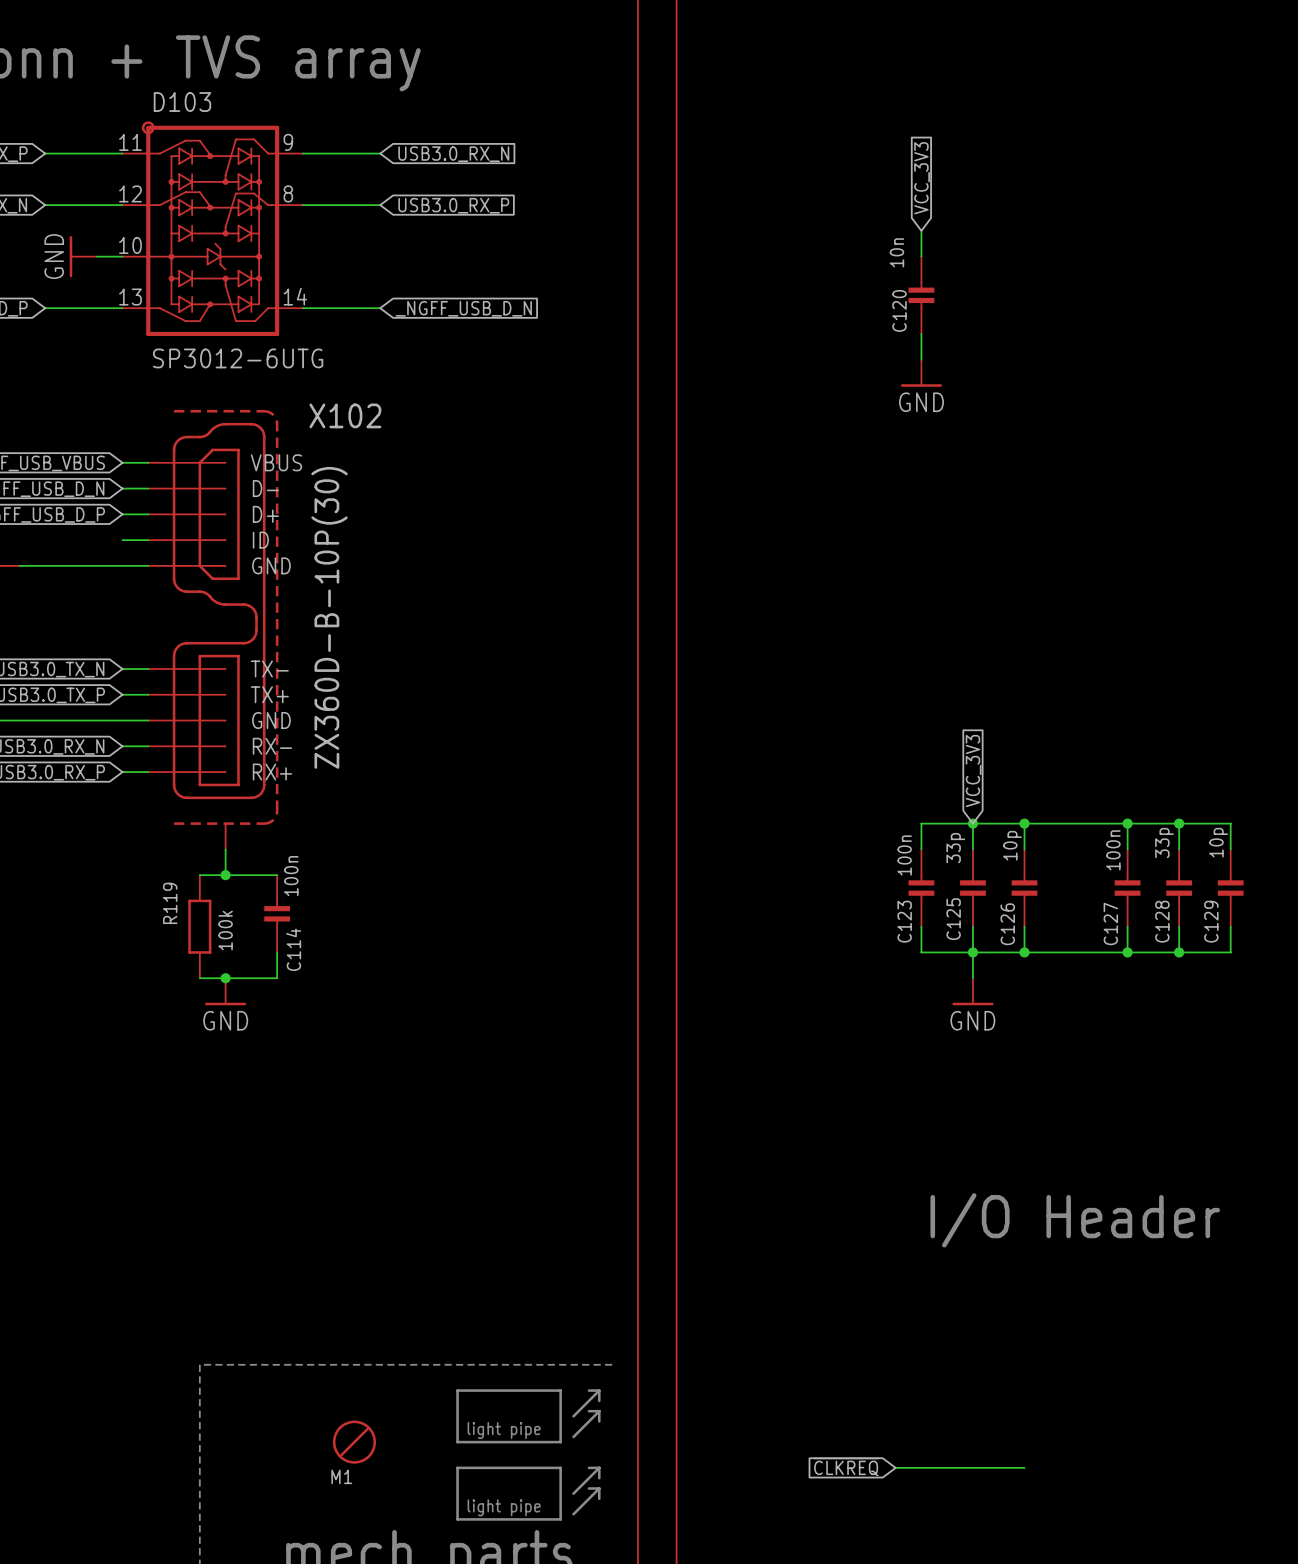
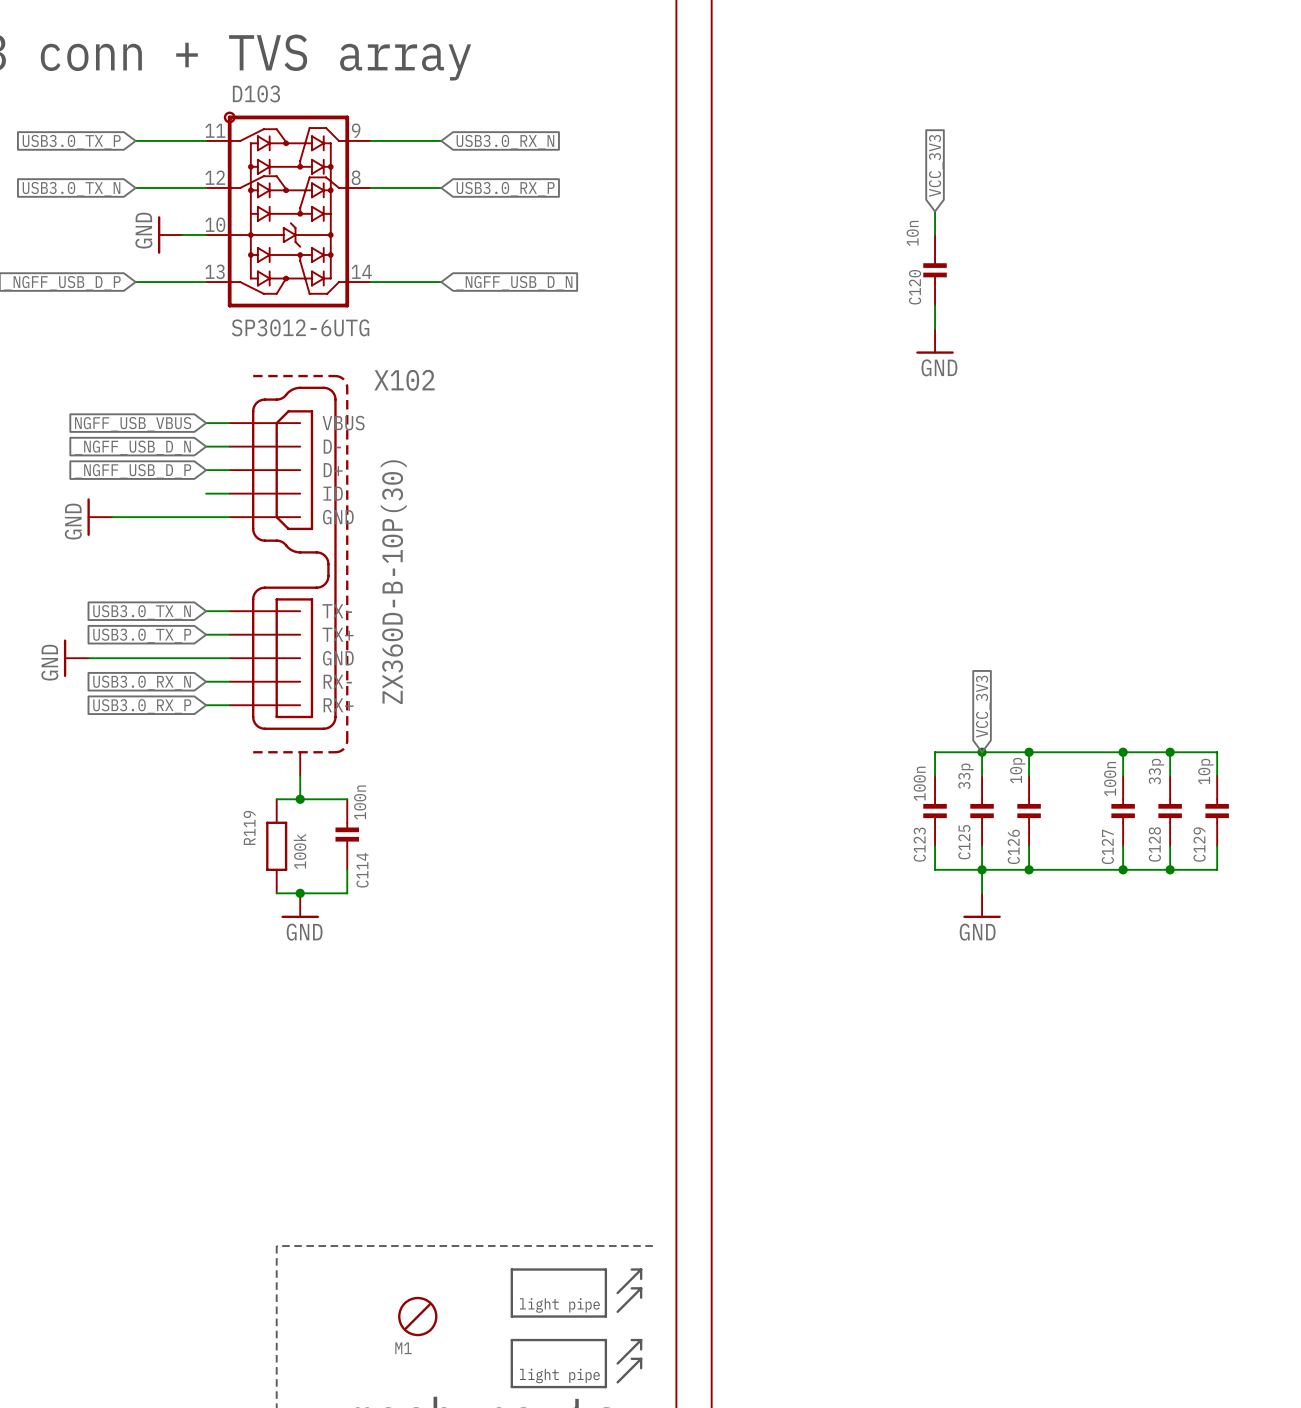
text: I/O Header (1075, 1220) -> none
global label: ~{CLKREQ} (846, 1467) -> none
wire: (895, 1467) (1024, 1467) -> none

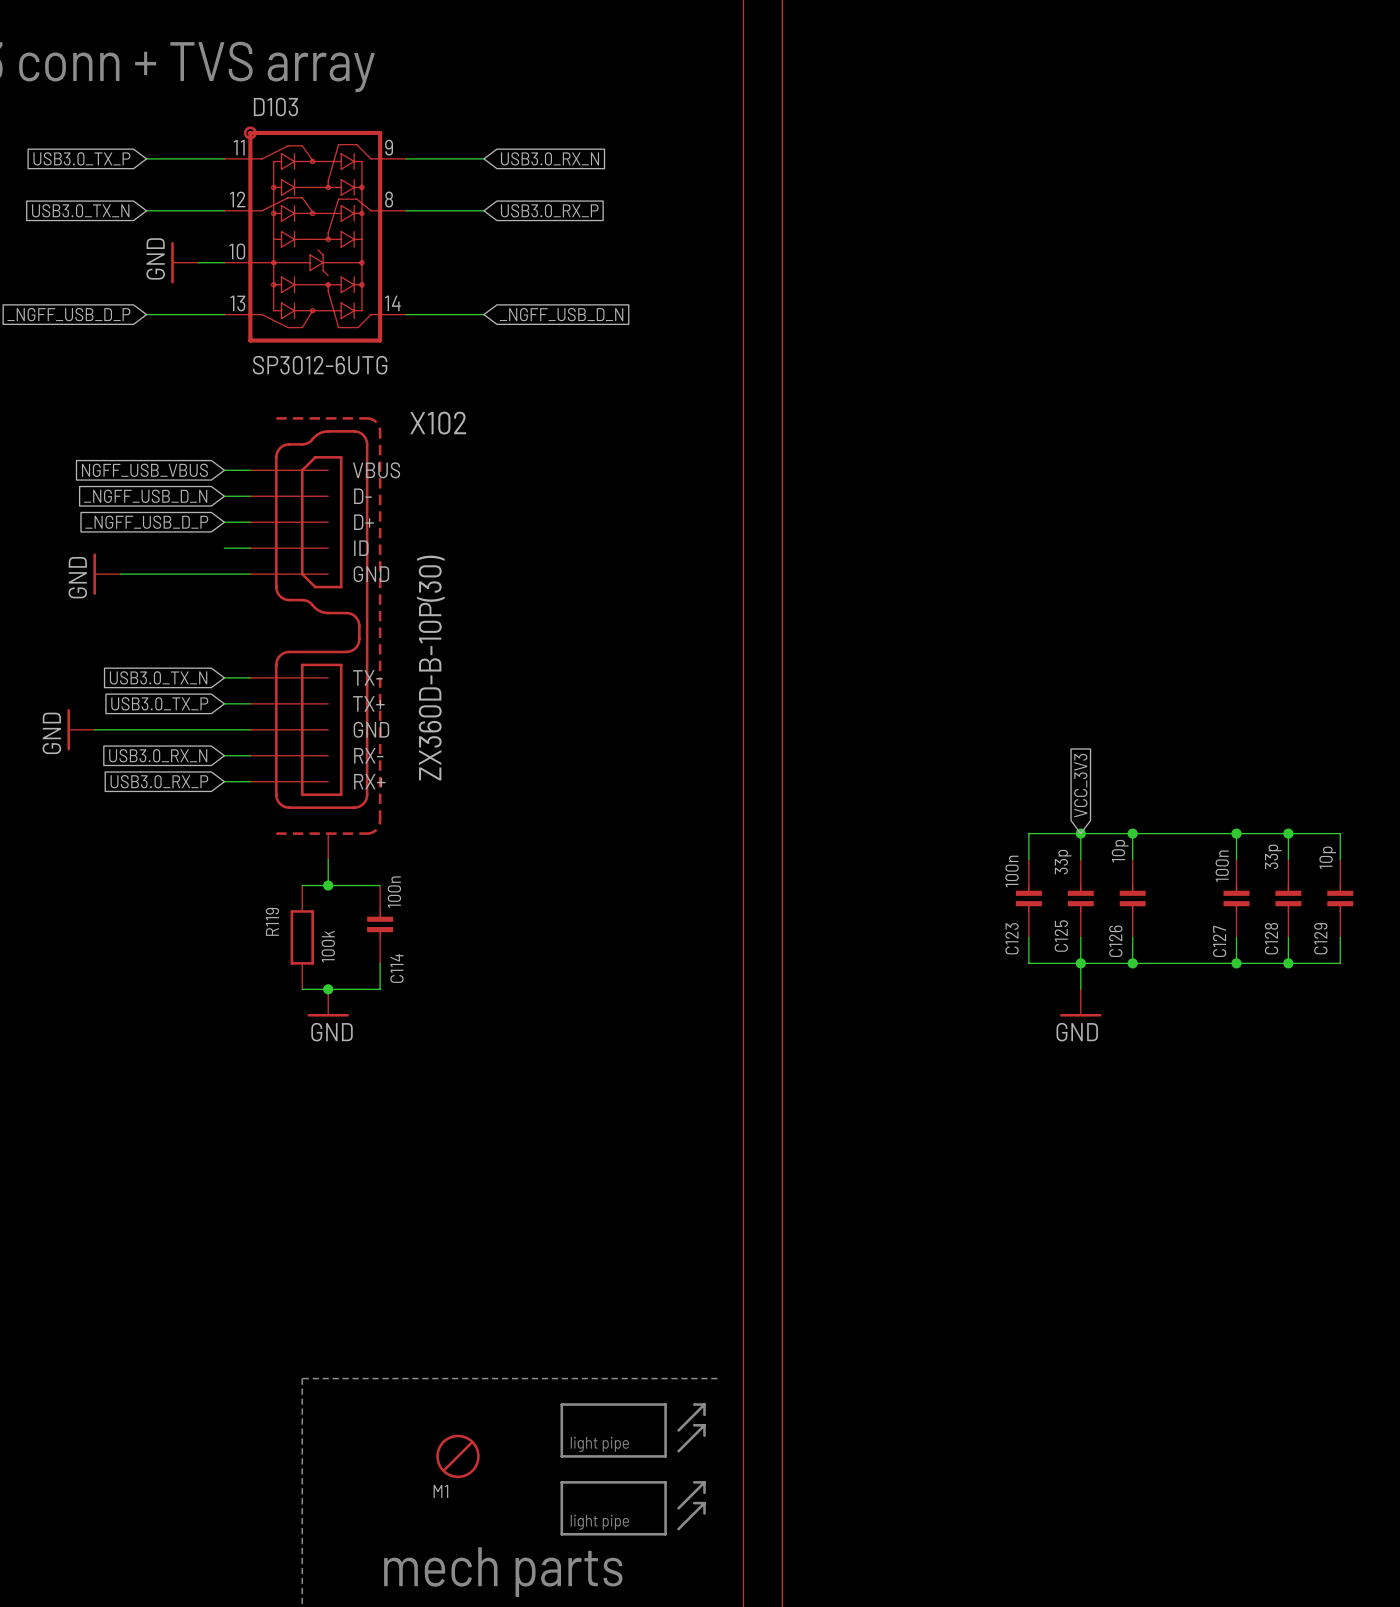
global label: VCC_3V3 (936, 165) -> none
wire: (935, 211) (935, 235) -> none
C120: 10n (935, 270) -> none
wire: (935, 305) (935, 329) -> none
power symbol: GND (935, 341) -> none

